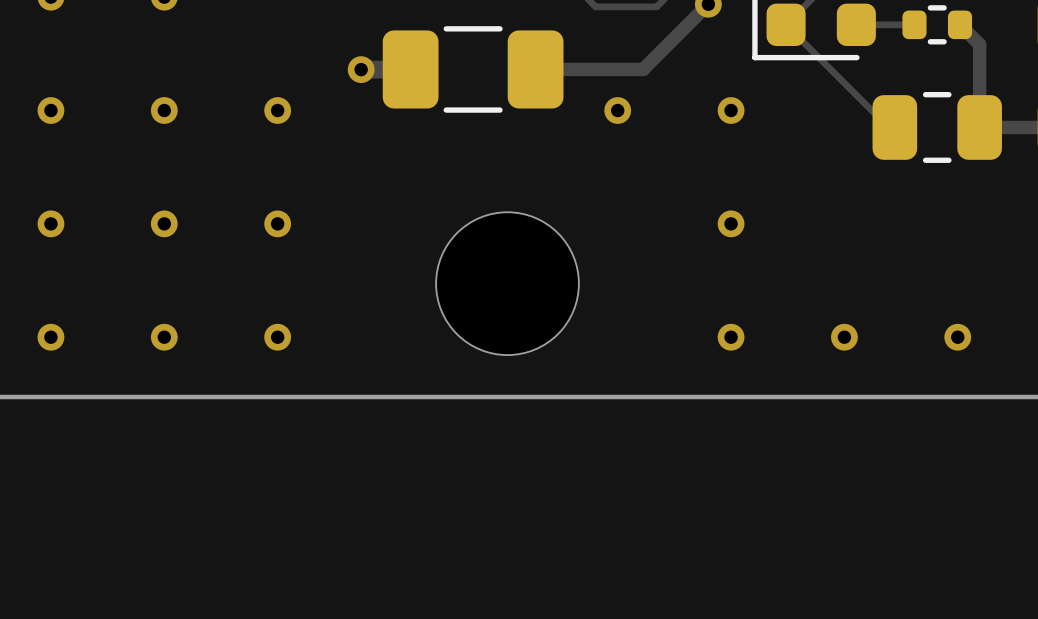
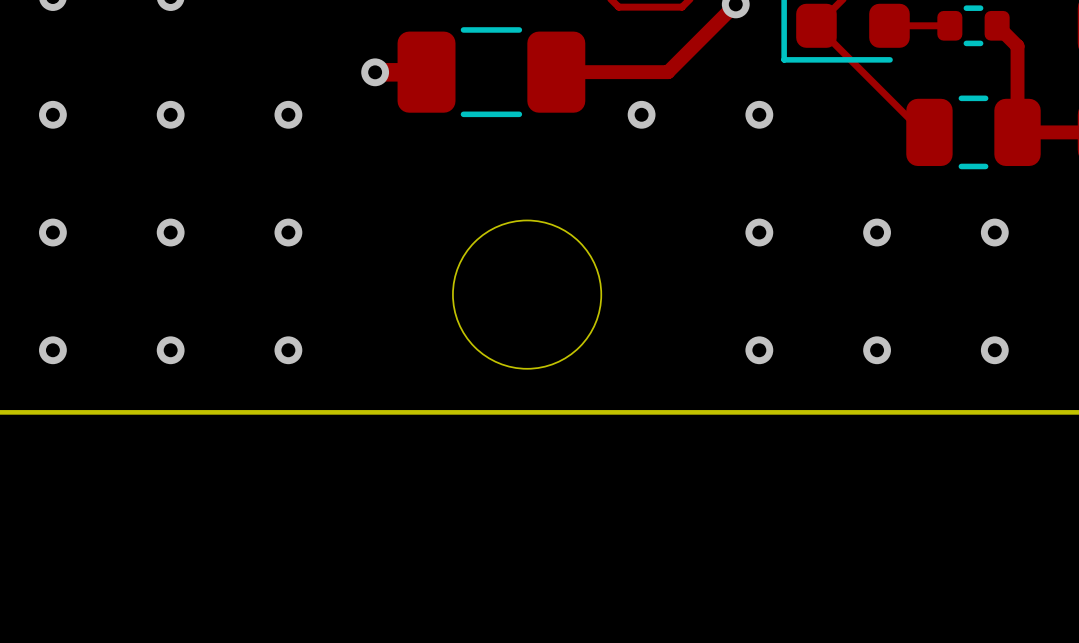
via: none -> (877, 232)
via: none -> (994, 232)

